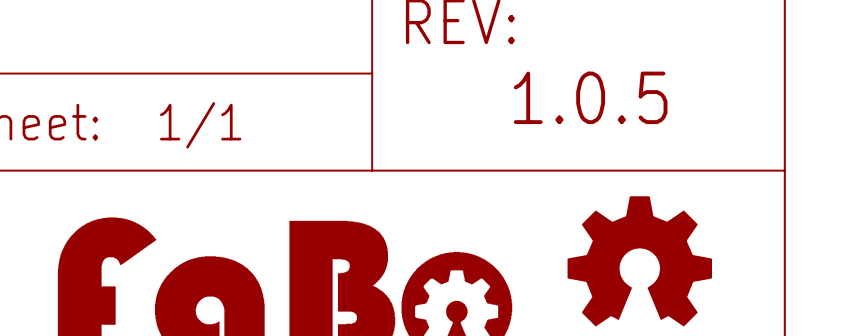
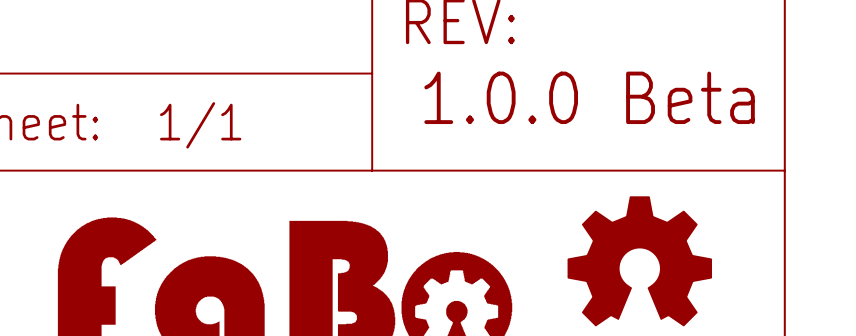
text: 1.0.5 (590, 97) -> 1.0.0 Beta (589, 97)

